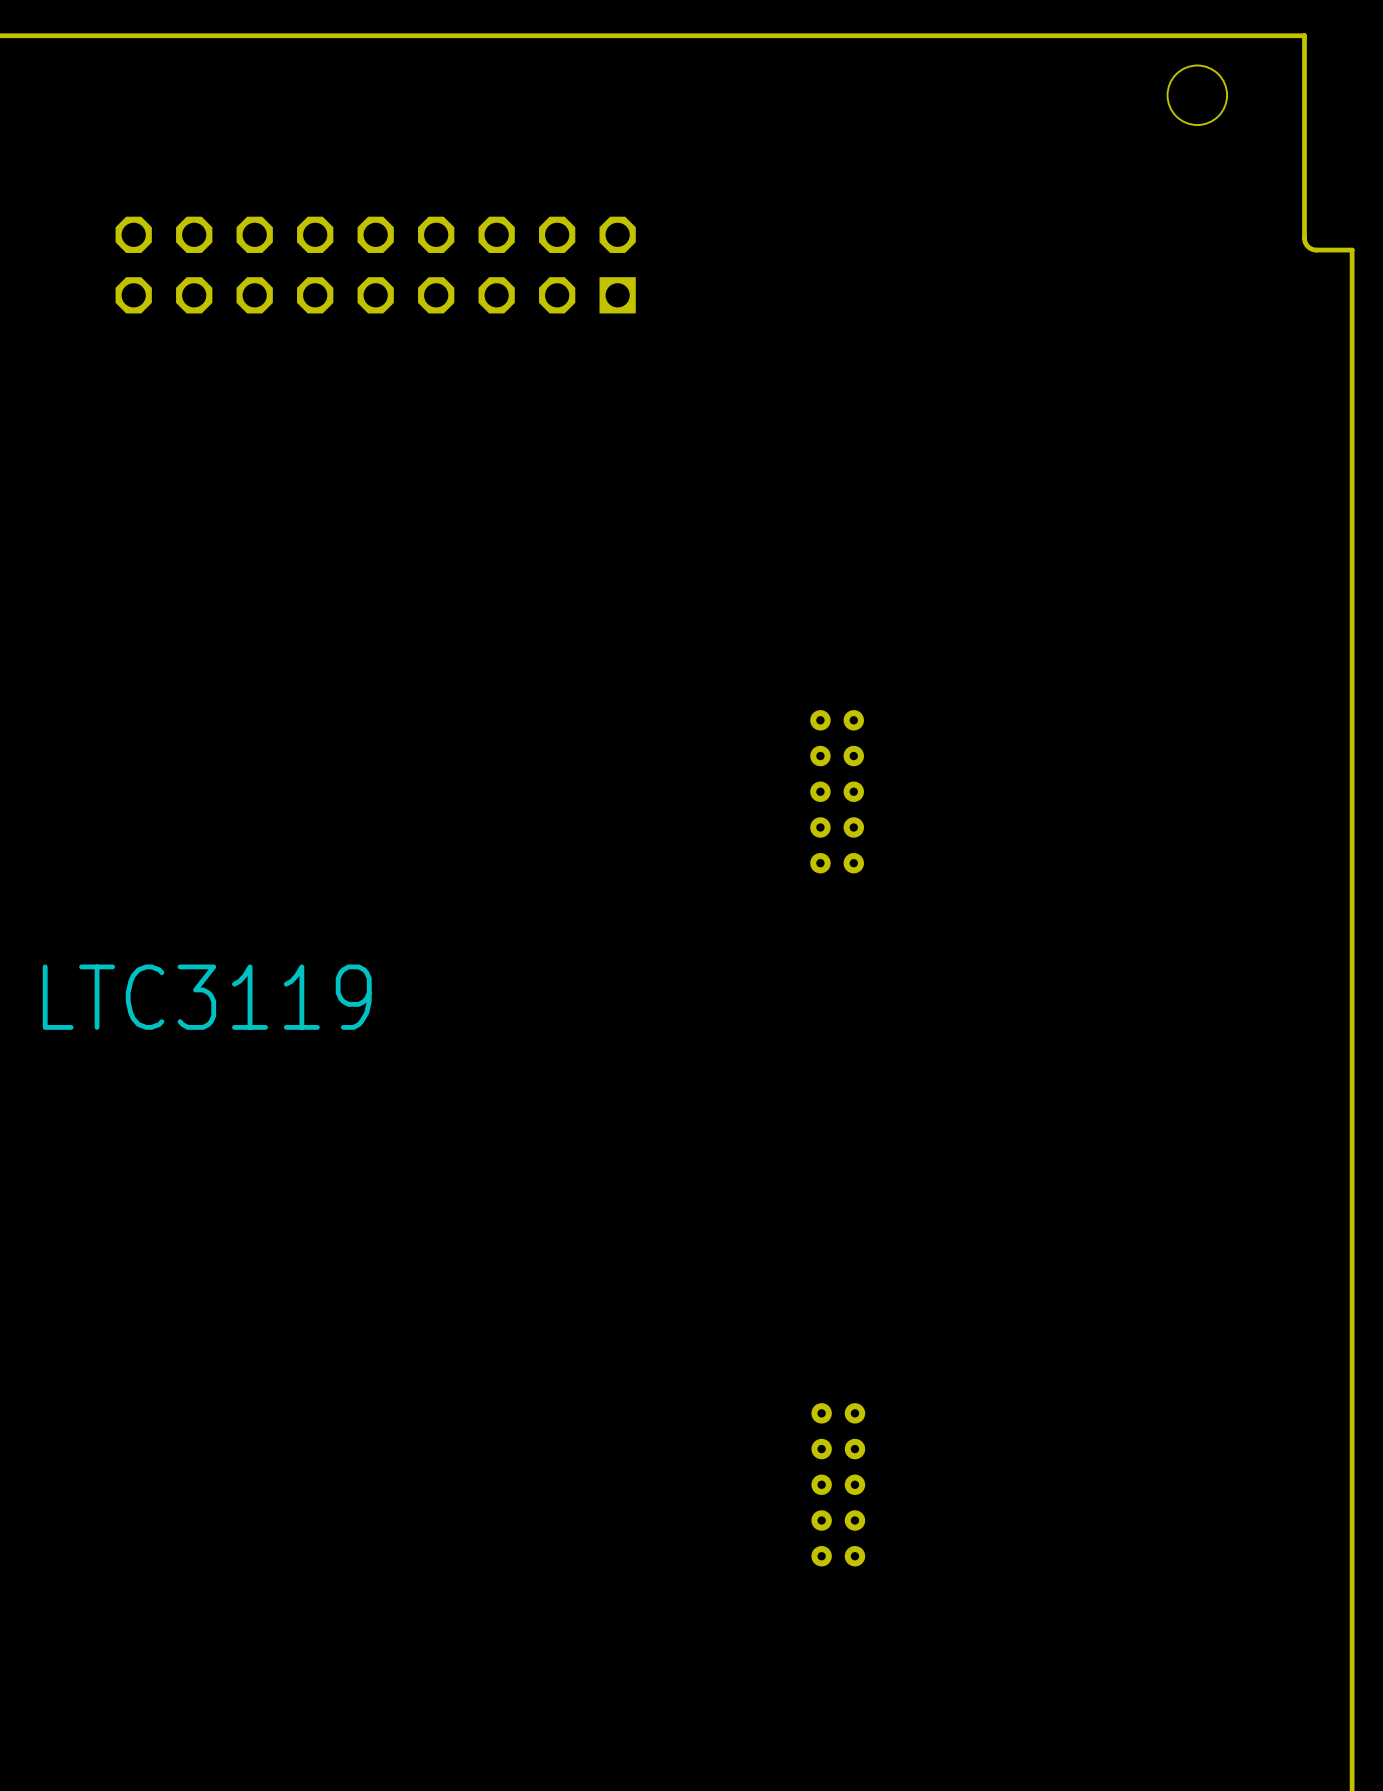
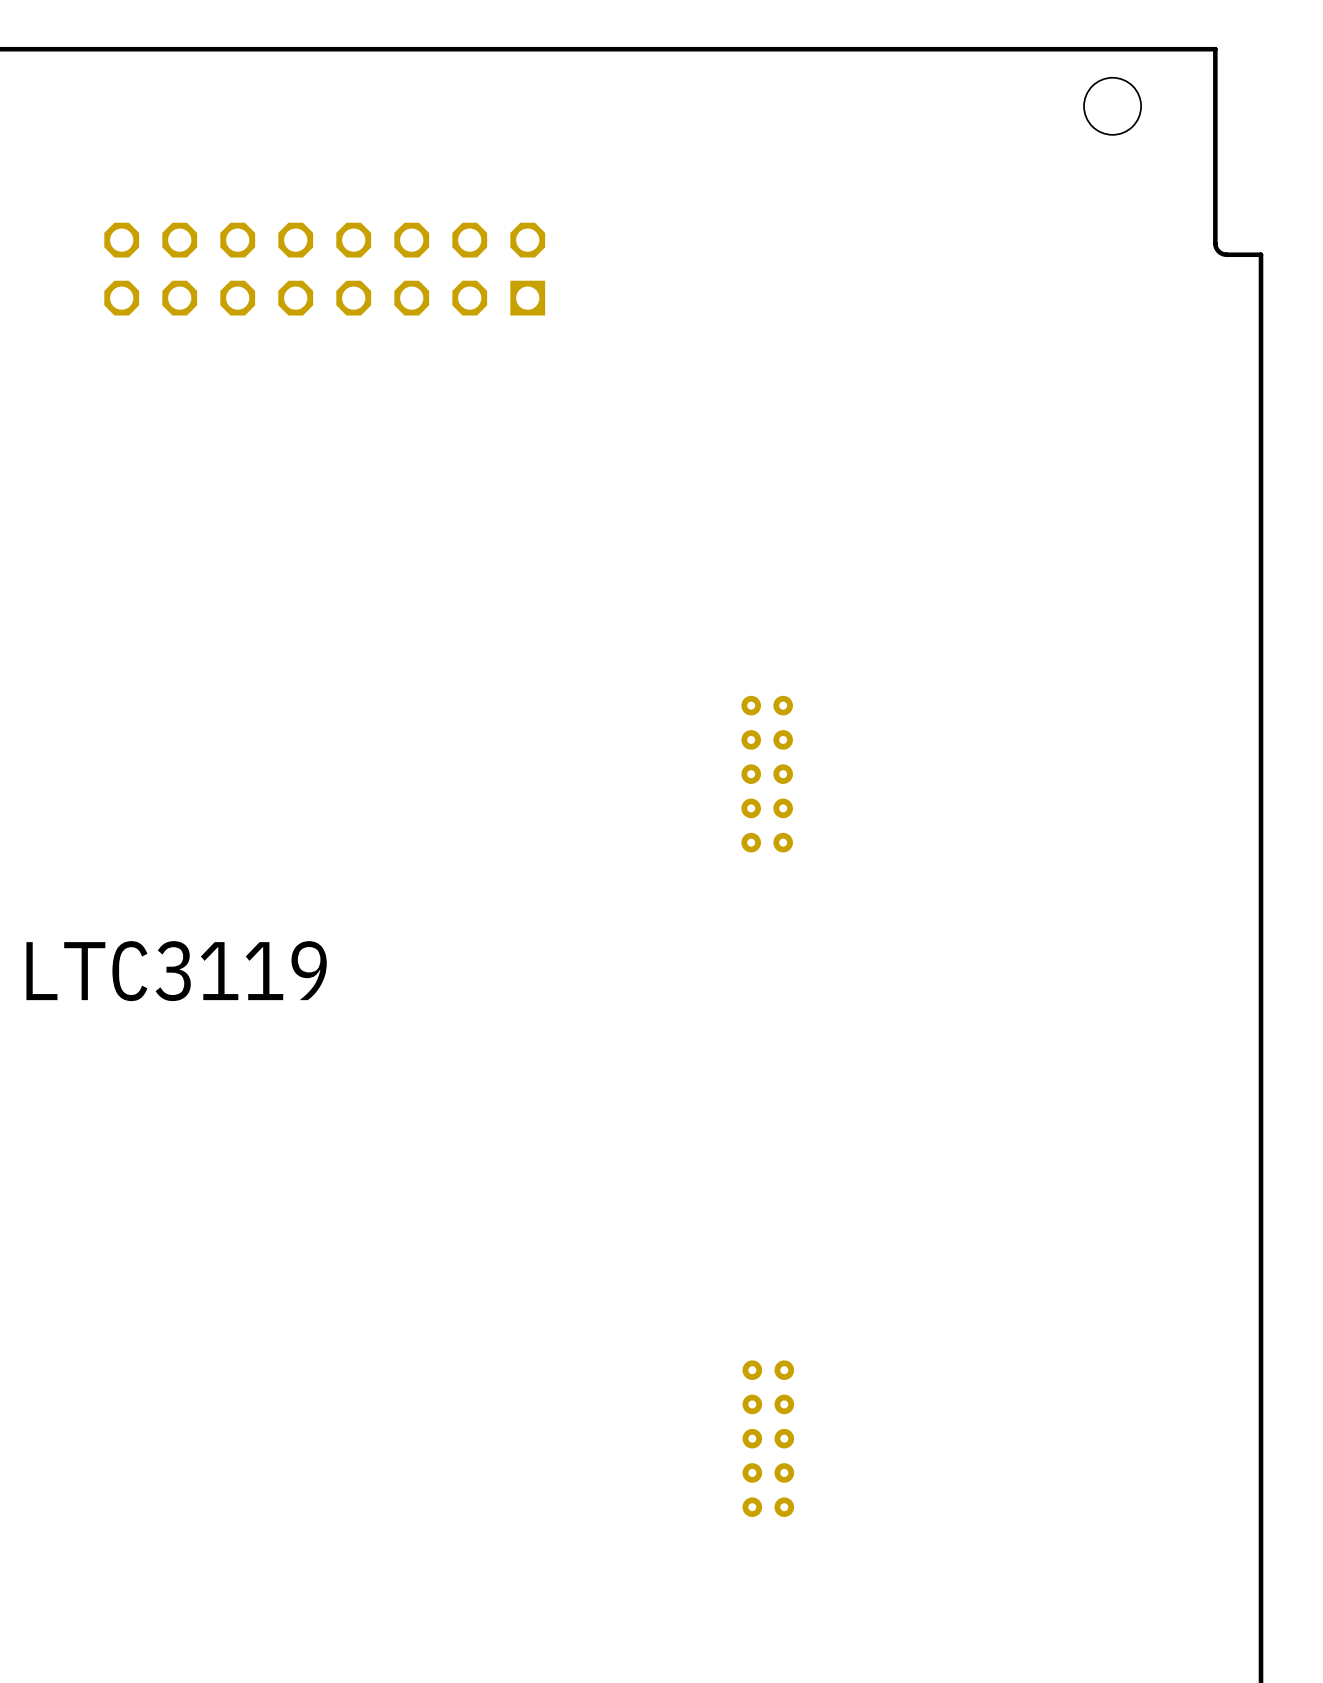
part footprint: [115, 216, 636, 314] -> [104, 222, 546, 316]

